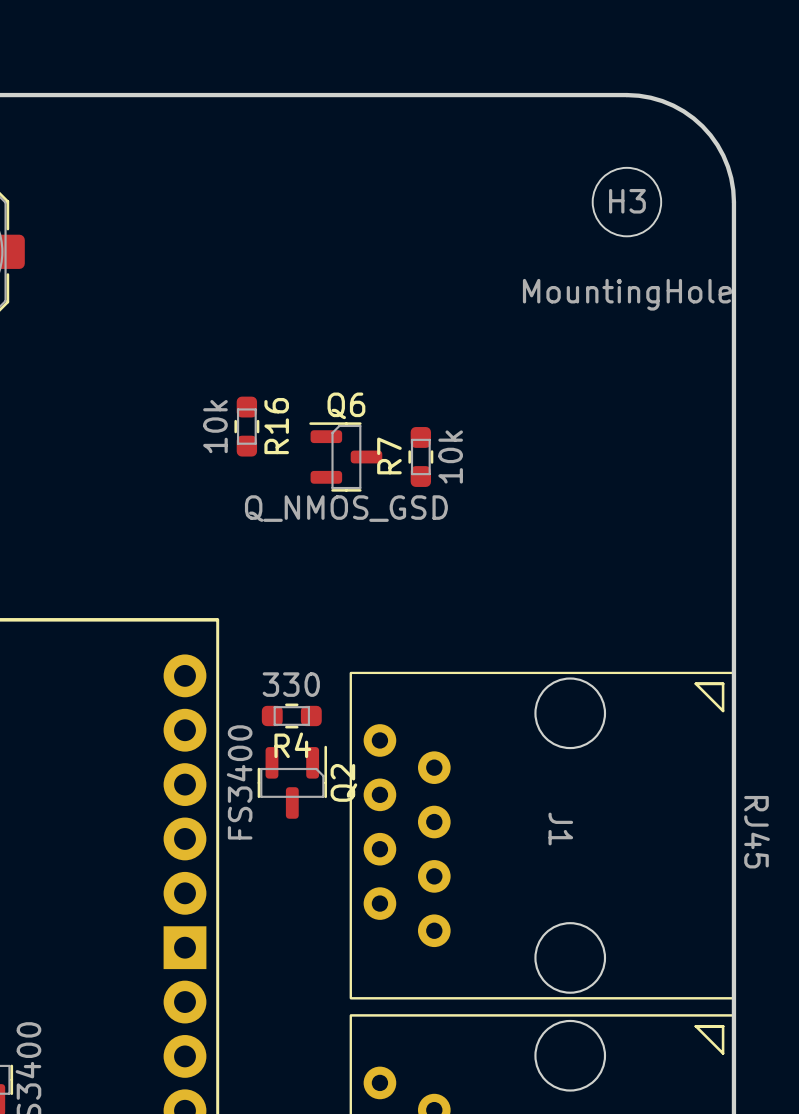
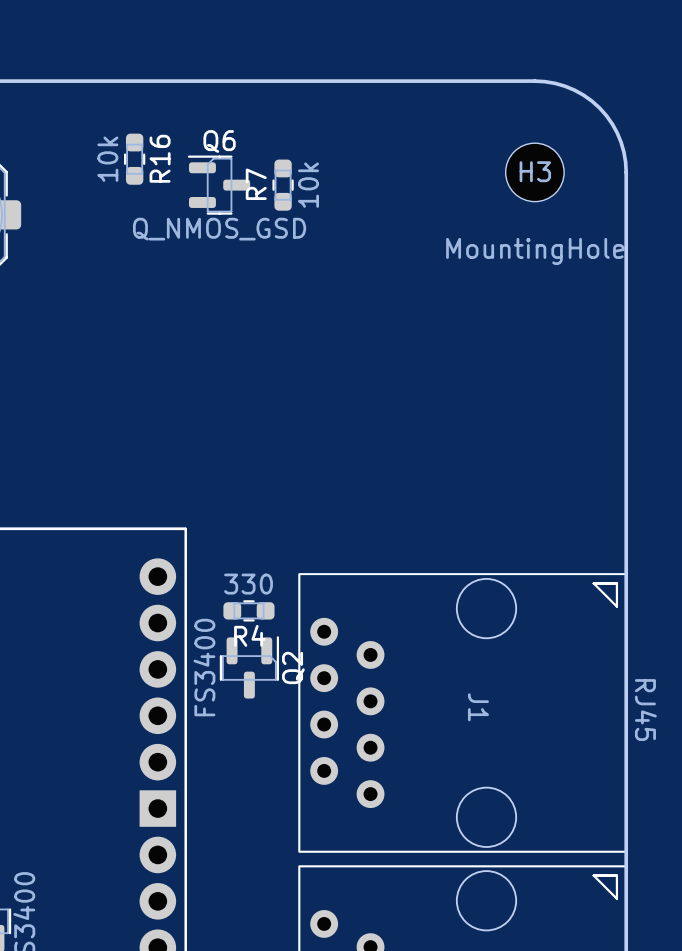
R16 position: (246, 426) -> (134, 159)
Q6 position: (345, 456) -> (219, 185)
R7 position: (420, 456) -> (283, 185)

